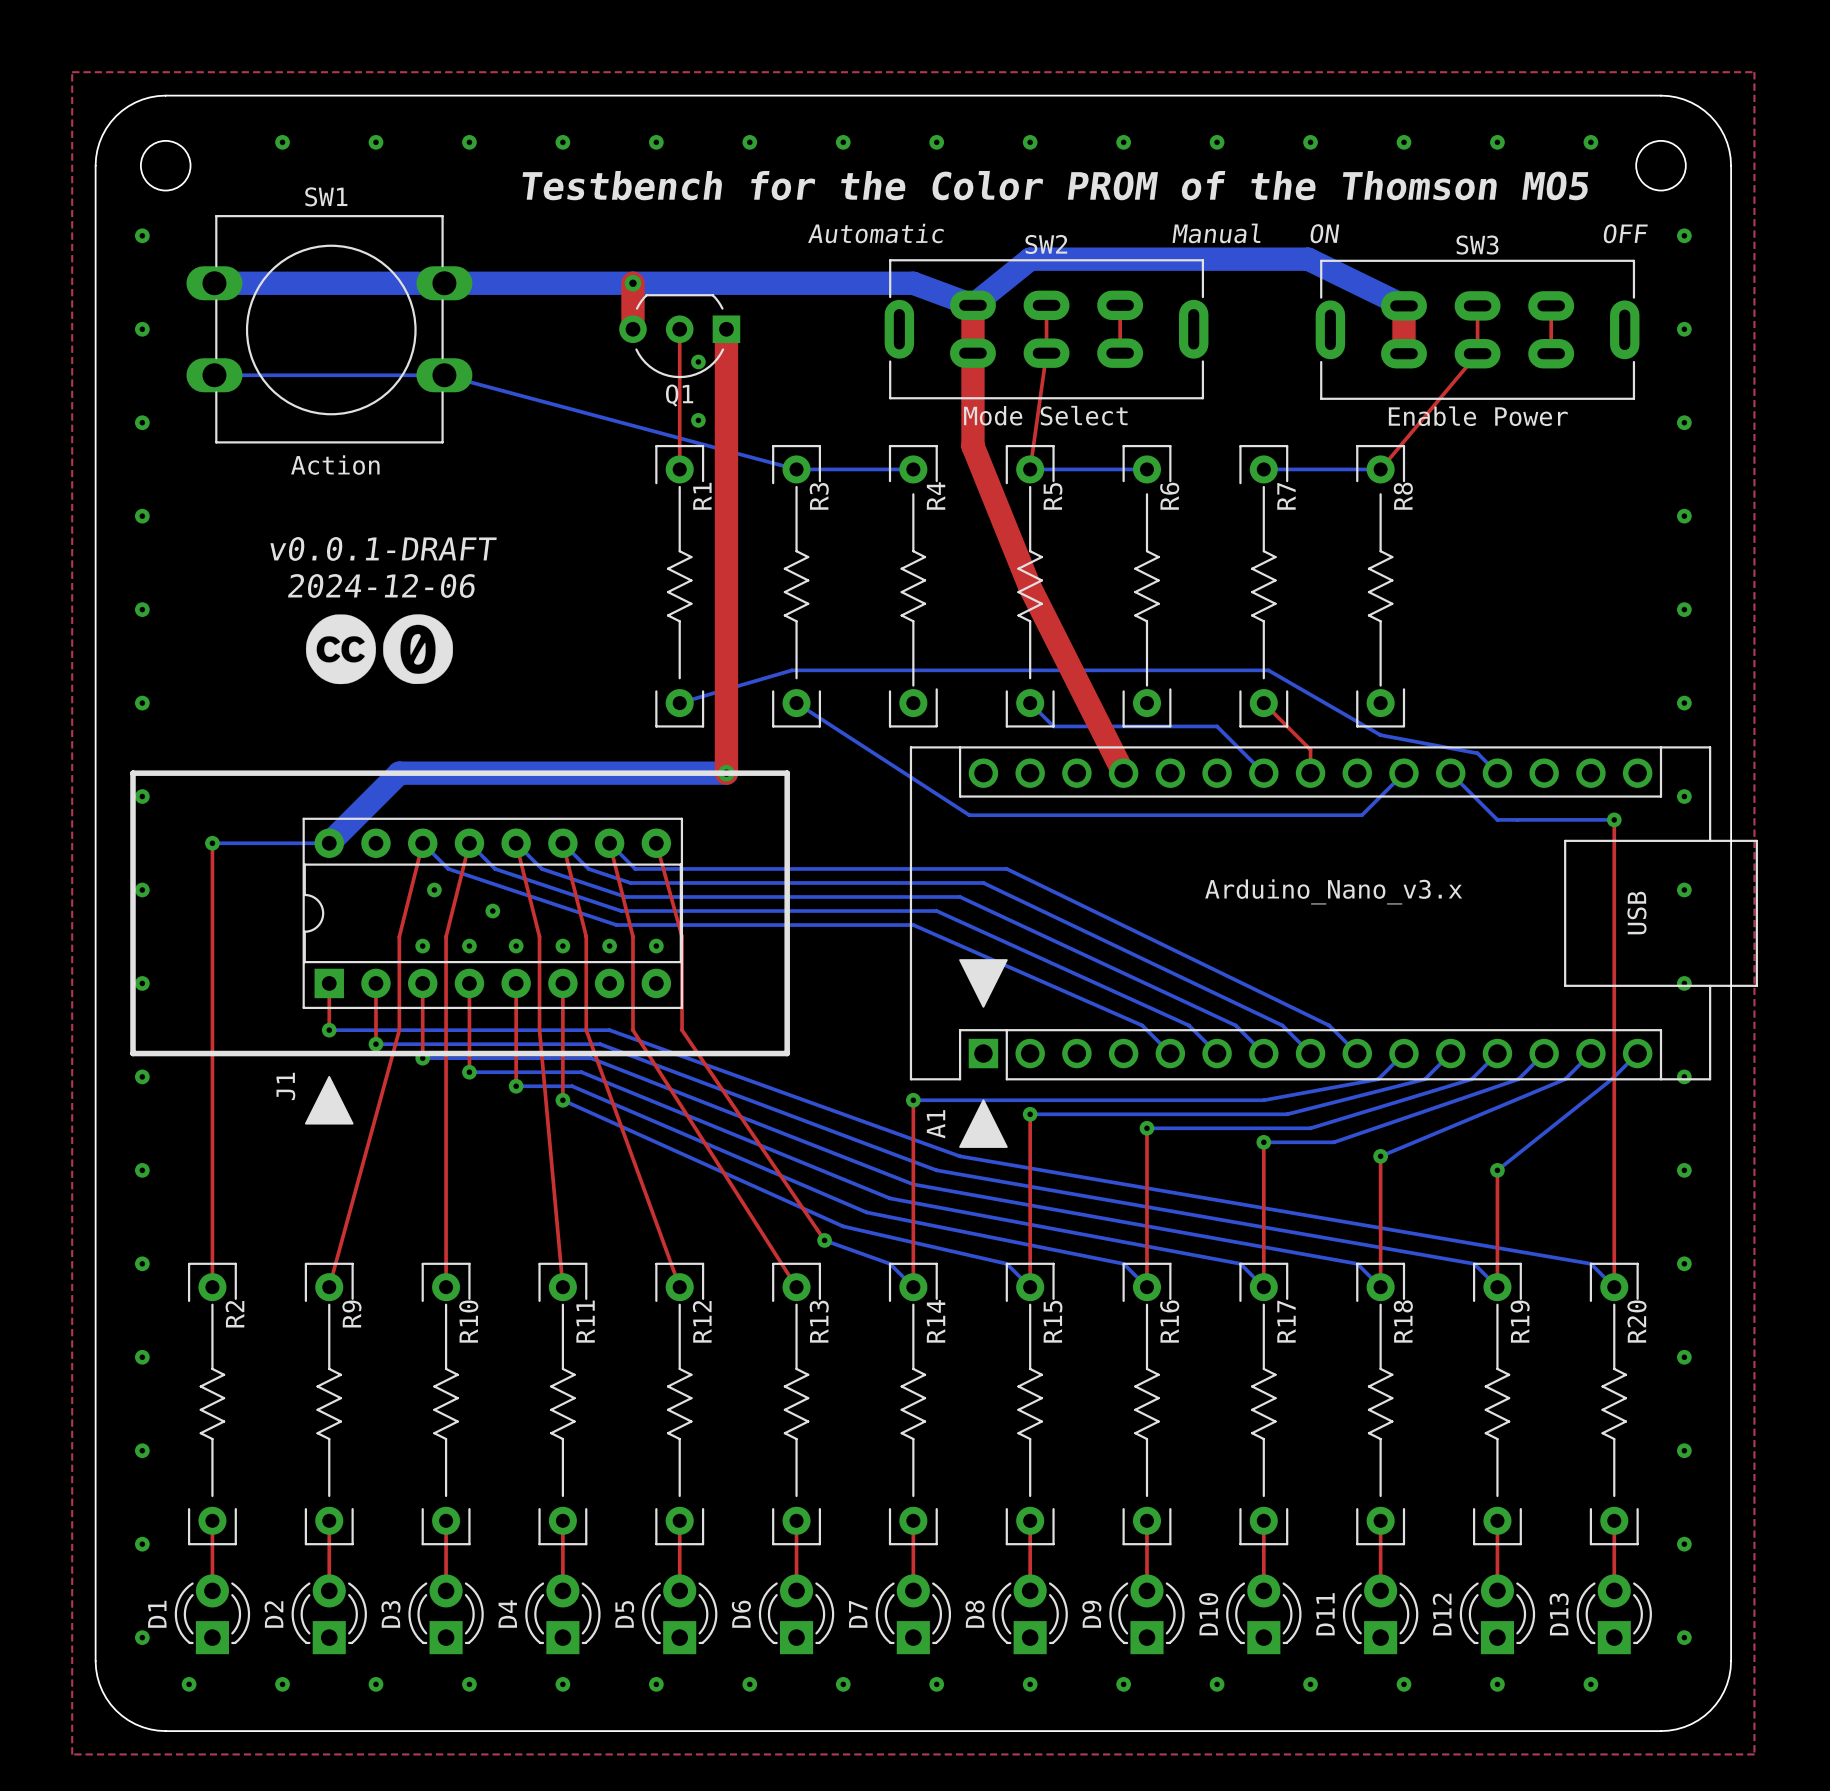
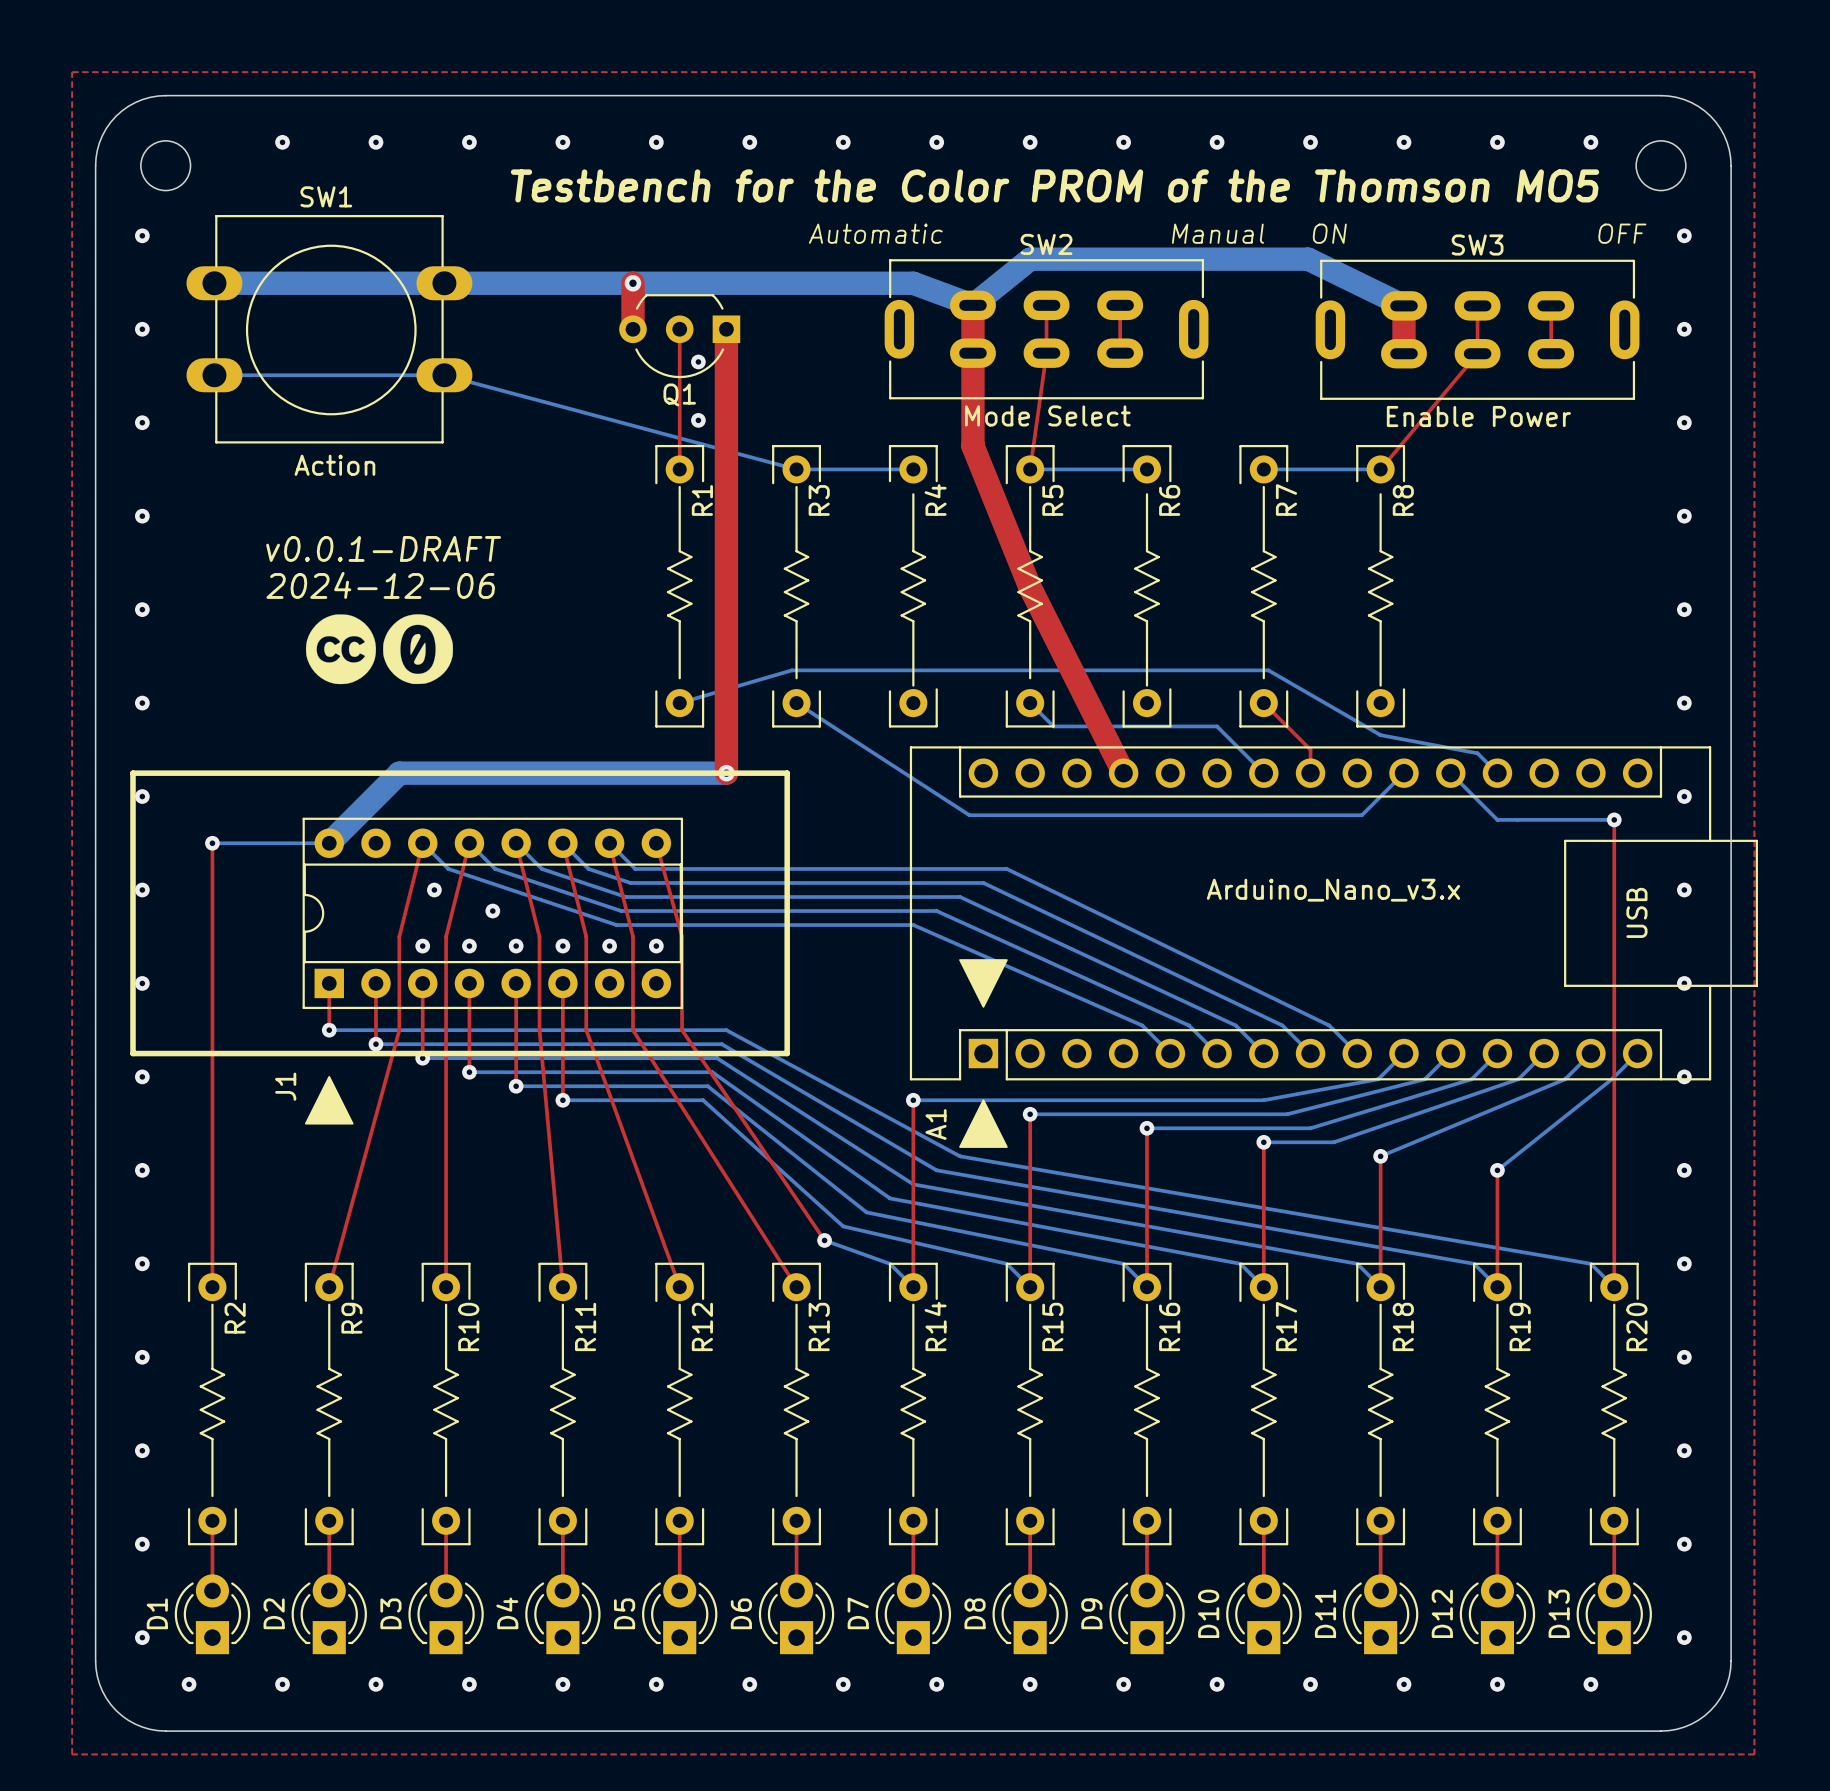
bottom track: (609, 1030) (960, 1156) -> (609, 1030) (726, 1030) (960, 1156)
bottom track: (600, 1044) (936, 1170) -> (600, 1044) (721, 1044) (936, 1170)
bottom track: (590, 1058) (913, 1184) -> (590, 1058) (717, 1058) (913, 1184)
bottom track: (581, 1072) (889, 1198) -> (581, 1072) (712, 1072) (889, 1198)
bottom track: (572, 1086) (866, 1212) -> (572, 1086) (707, 1086) (866, 1212)
bottom track: (562, 1100) (843, 1226) -> (562, 1100) (703, 1100) (843, 1226)

